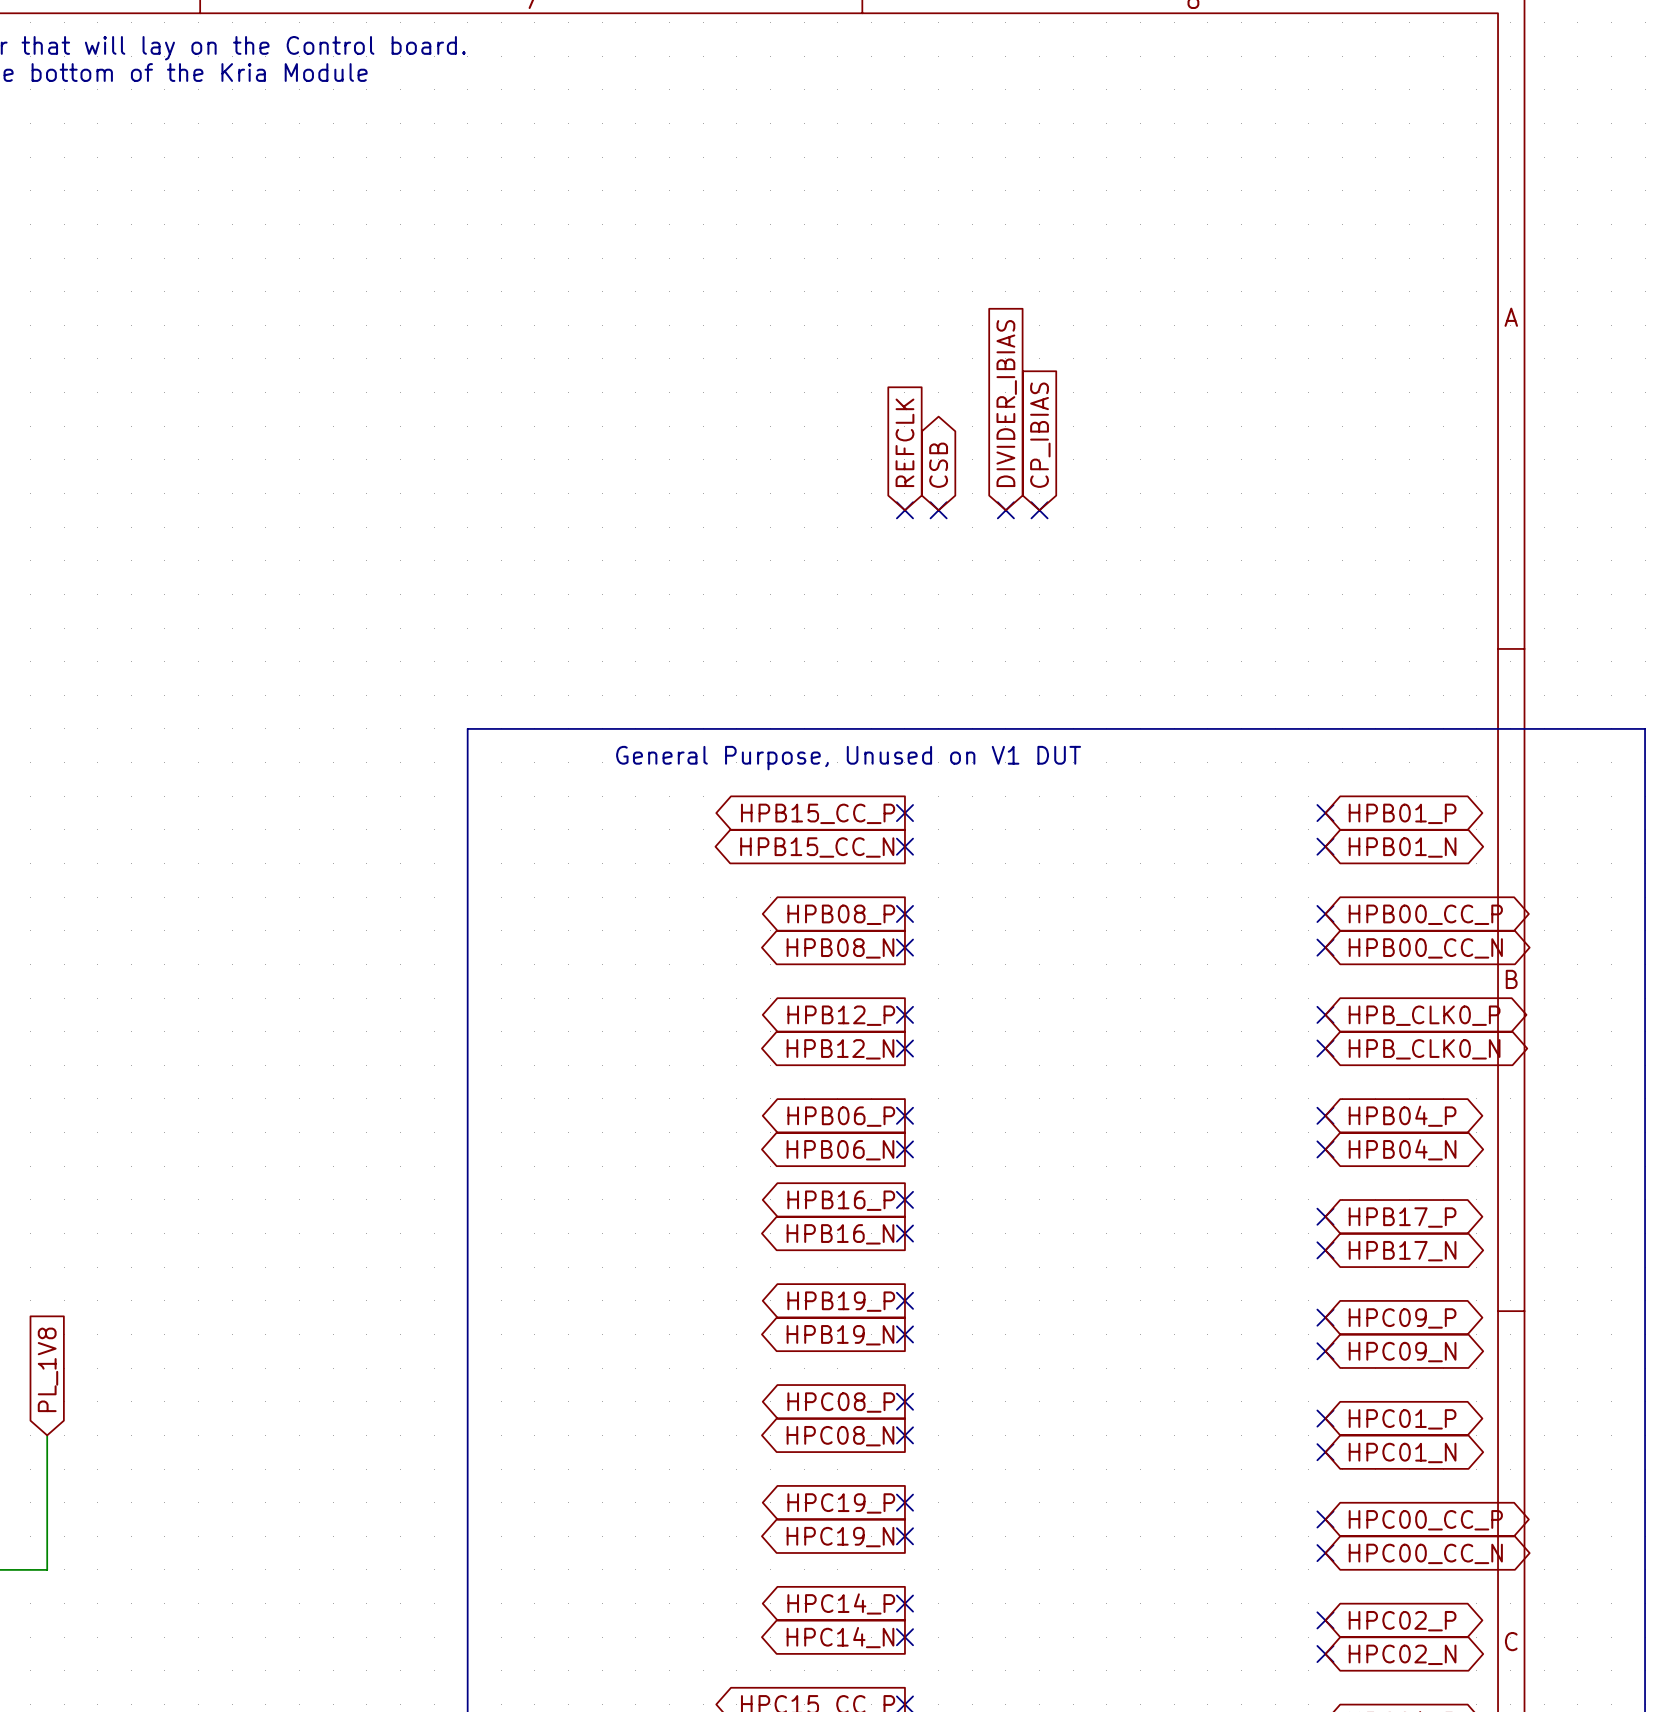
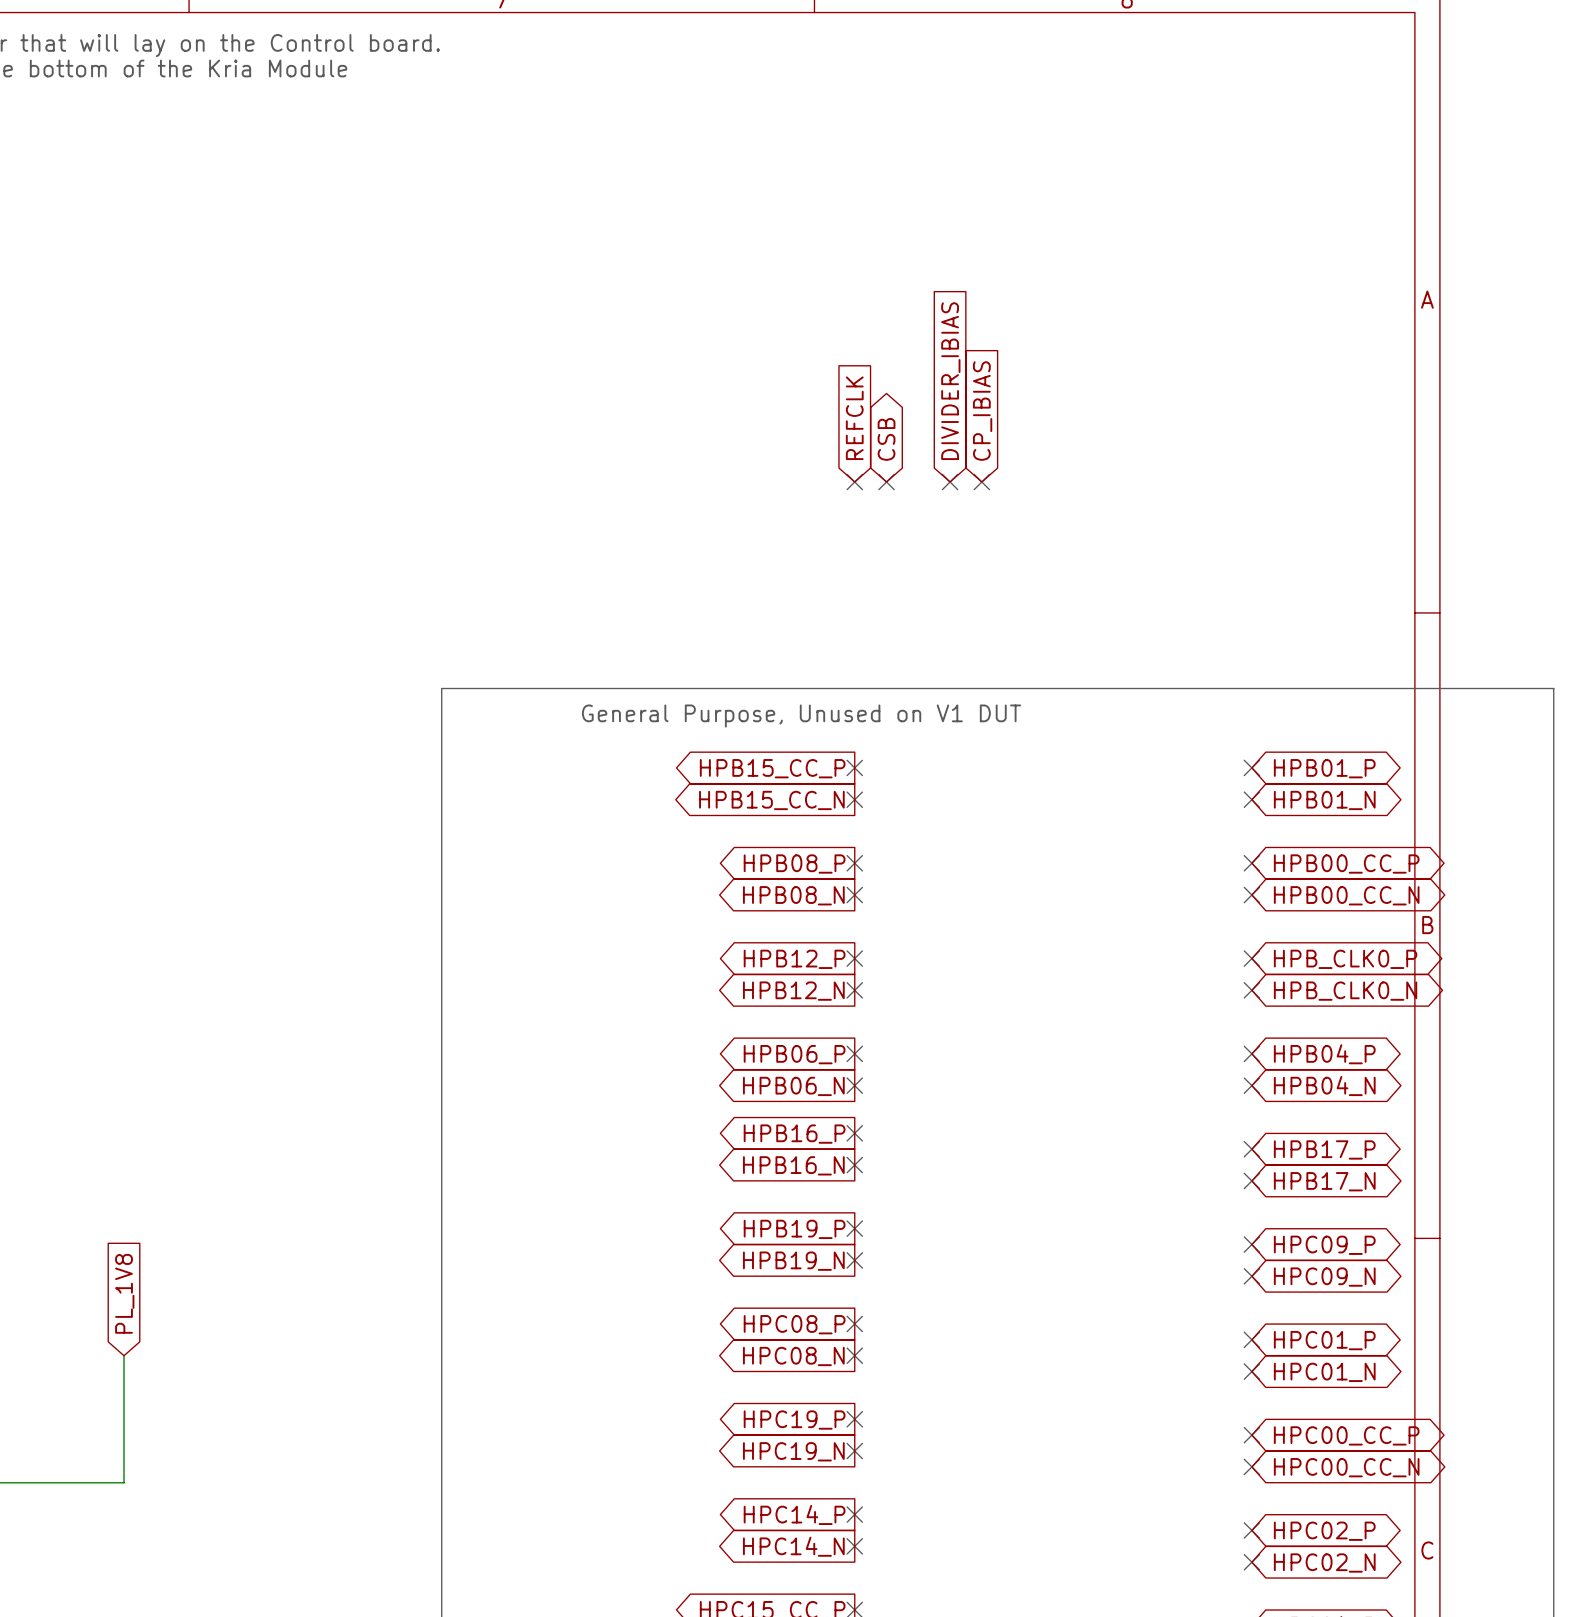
global label position: PL_1V8 (47, 1369) -> PL_1V8 (124, 1293)
wire: (47, 1435) (47, 1569) -> (124, 1355) (124, 1482) (44, 1482)

